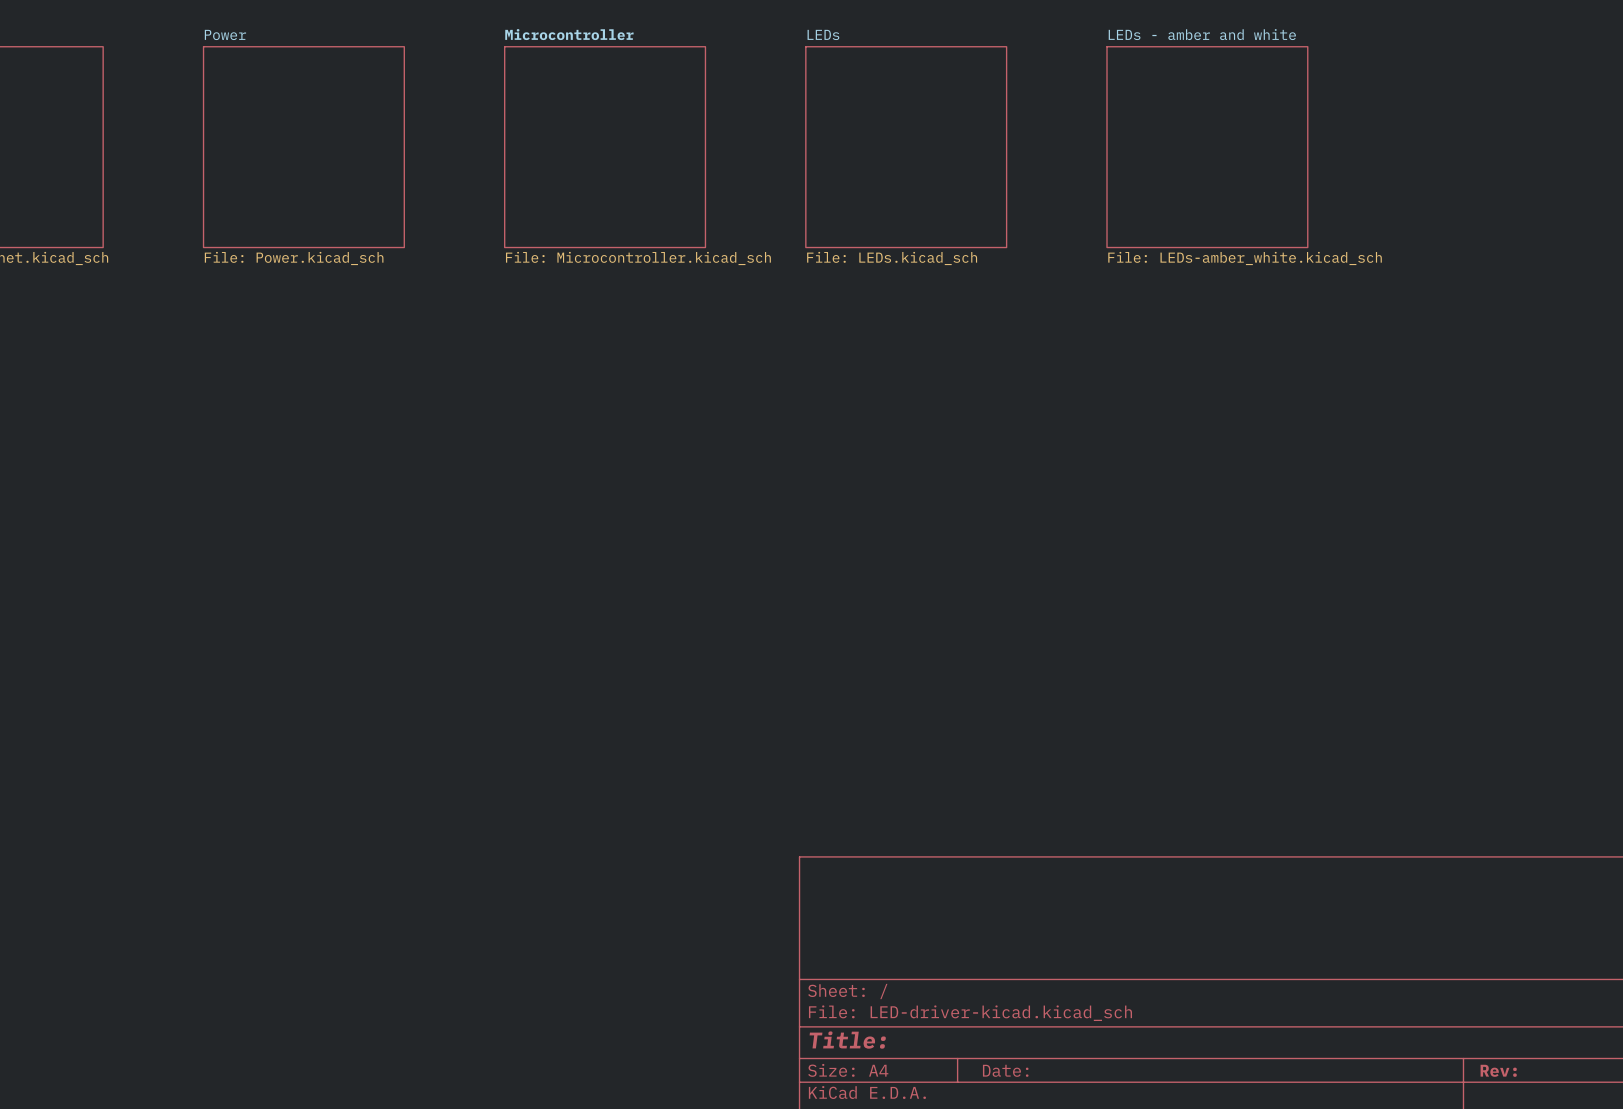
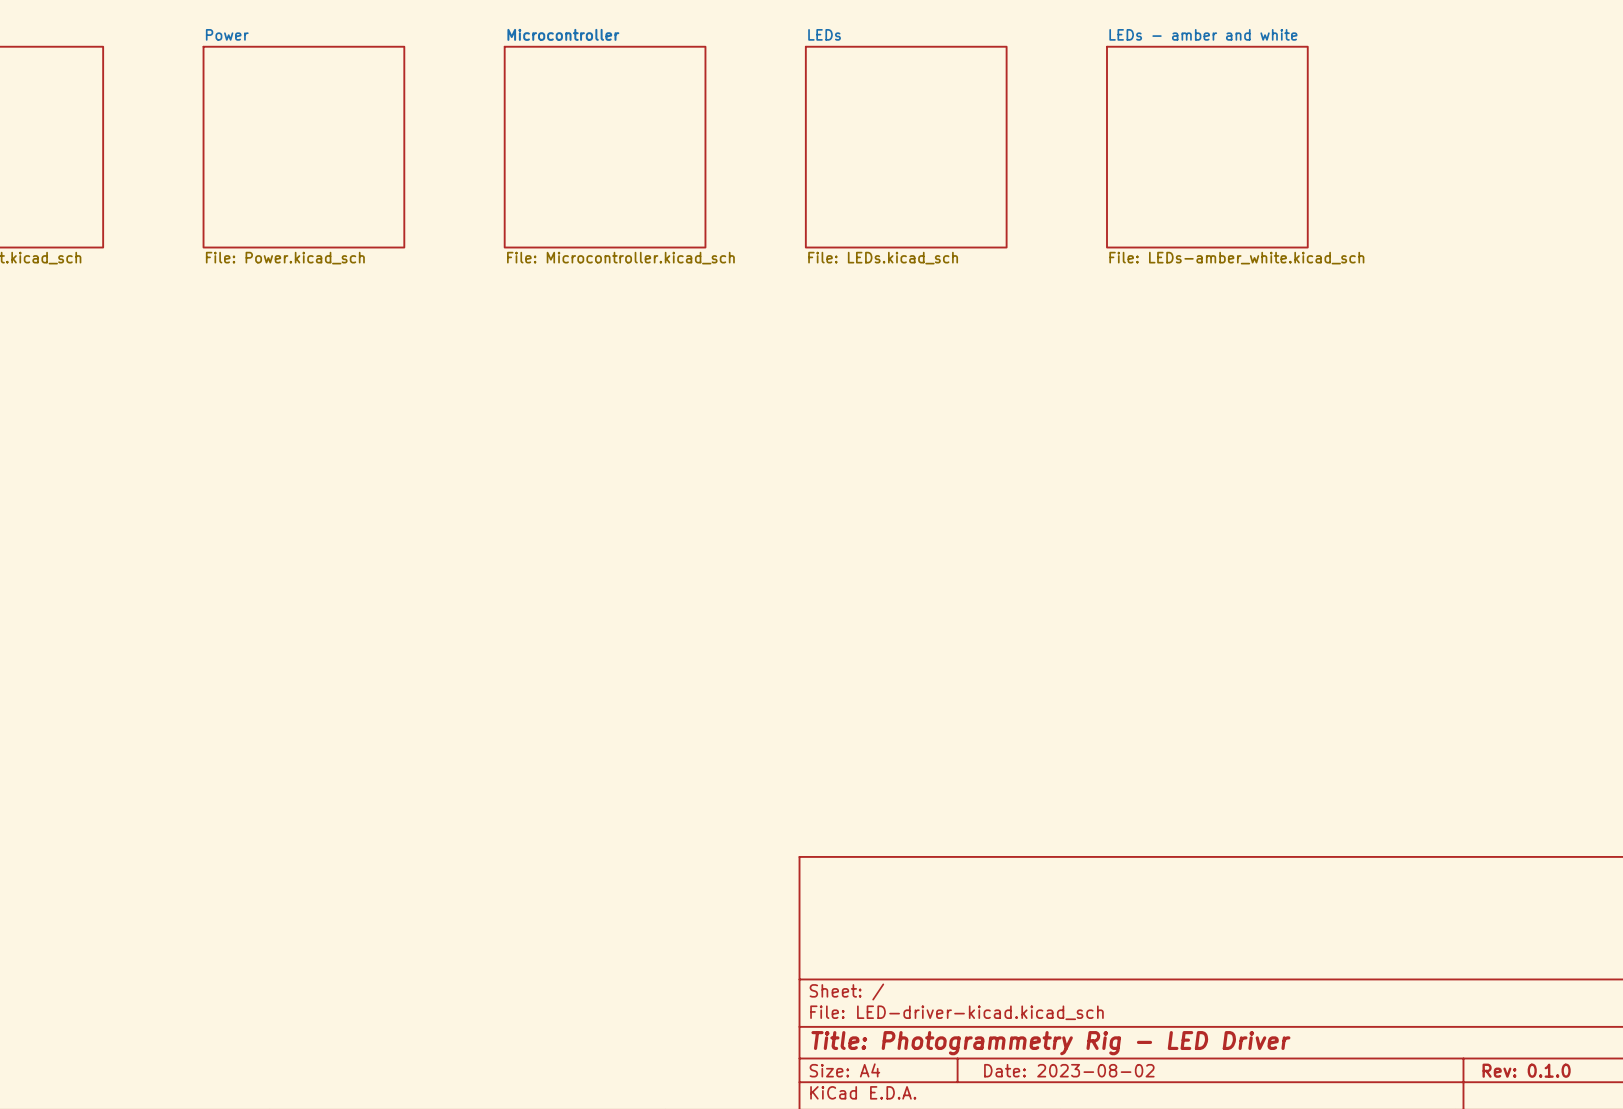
title block: Title: (847, 1040) -> Title: Photogrammetry Rig - LED Driver (1050, 1043)
title block: Date: (1005, 1070) -> Date: 2023-08-02 (1069, 1070)
title block: Rev: (1498, 1070) -> Rev: 0.1.0 (1526, 1070)

